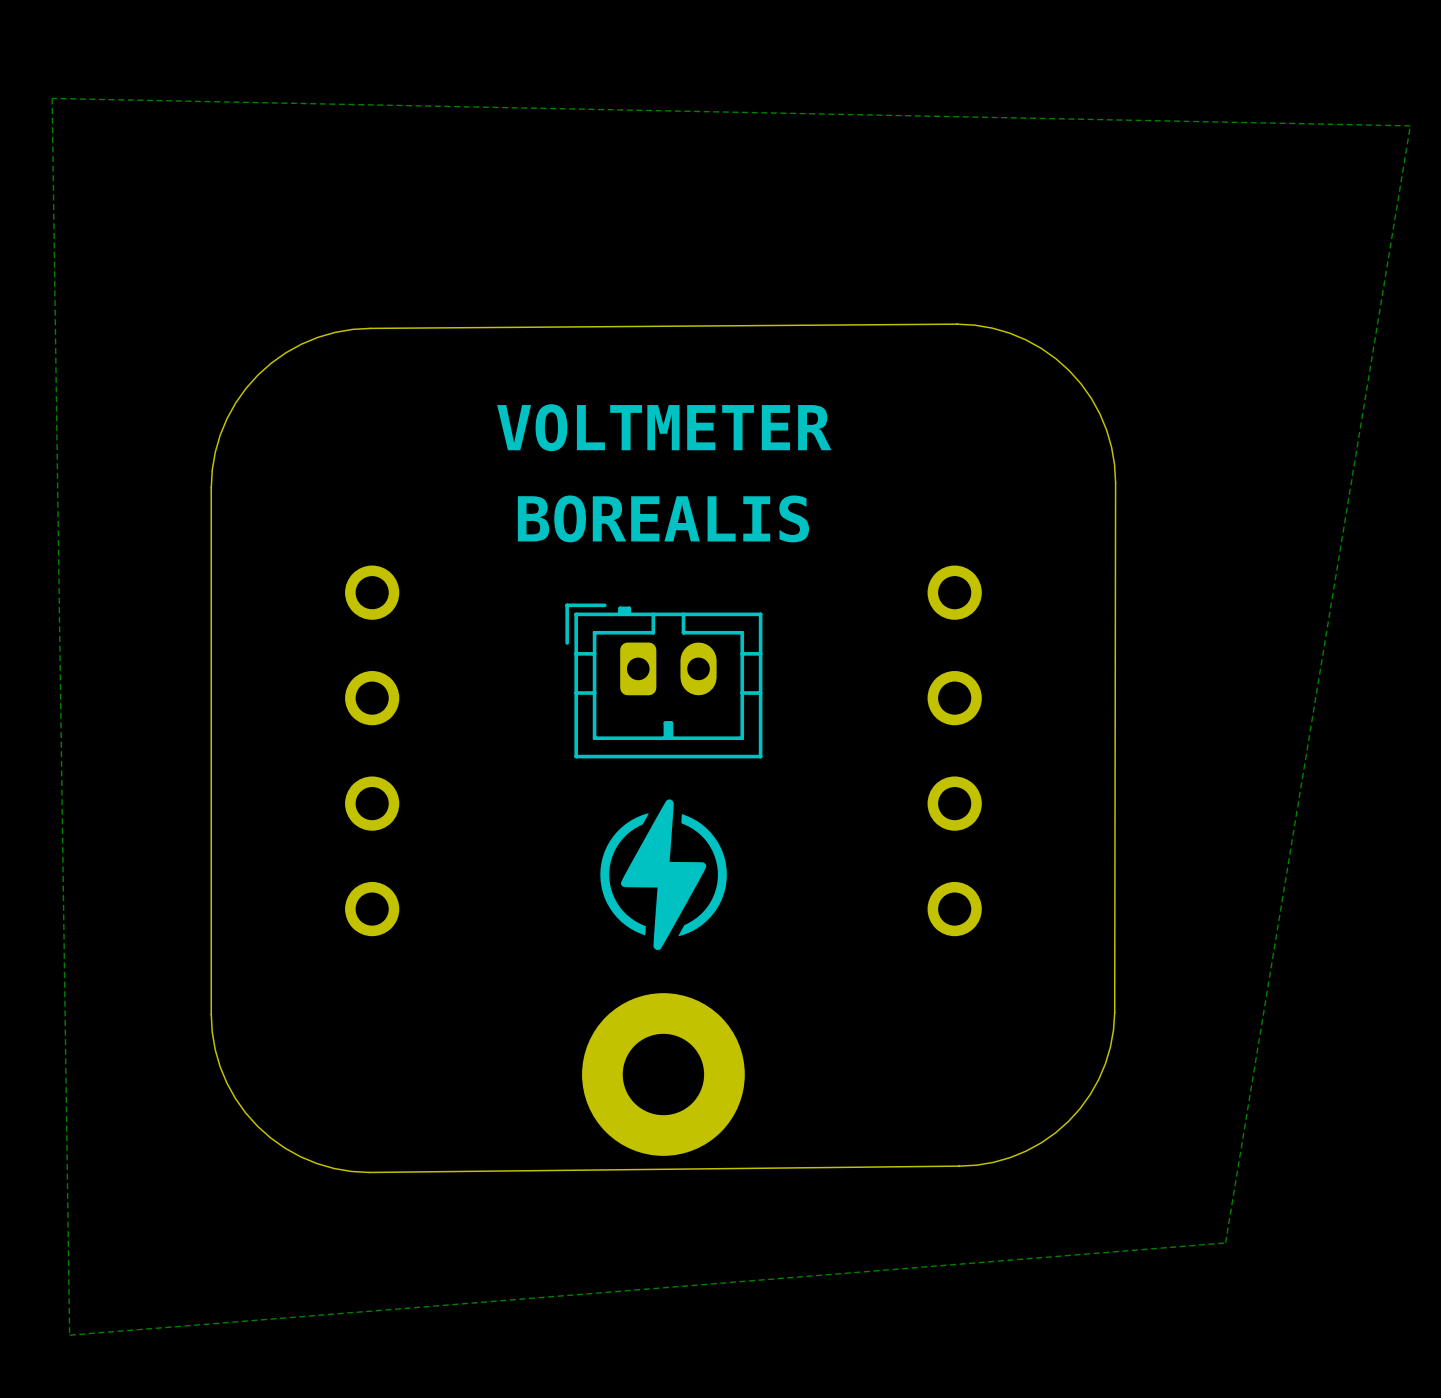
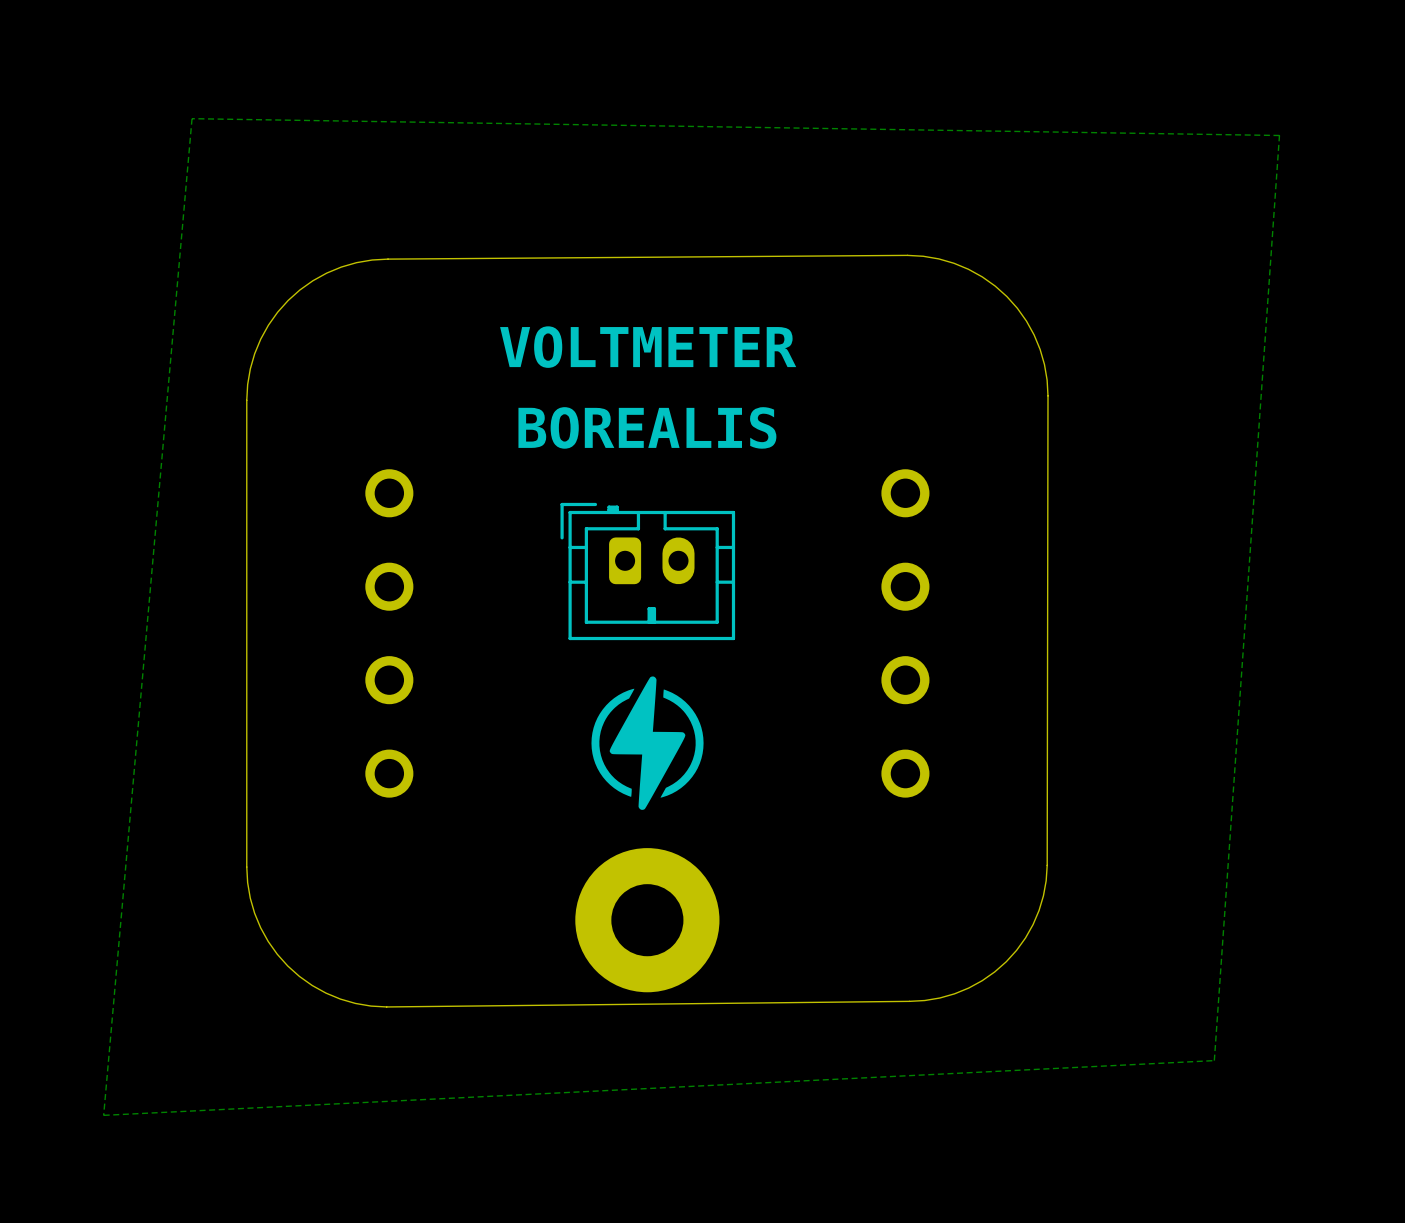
zone outline: (52, 98) (1410, 125) (1225, 1242) (69, 1335) (52, 98) -> (192, 118) (1279, 135) (1214, 1060) (103, 1115) (192, 118)

